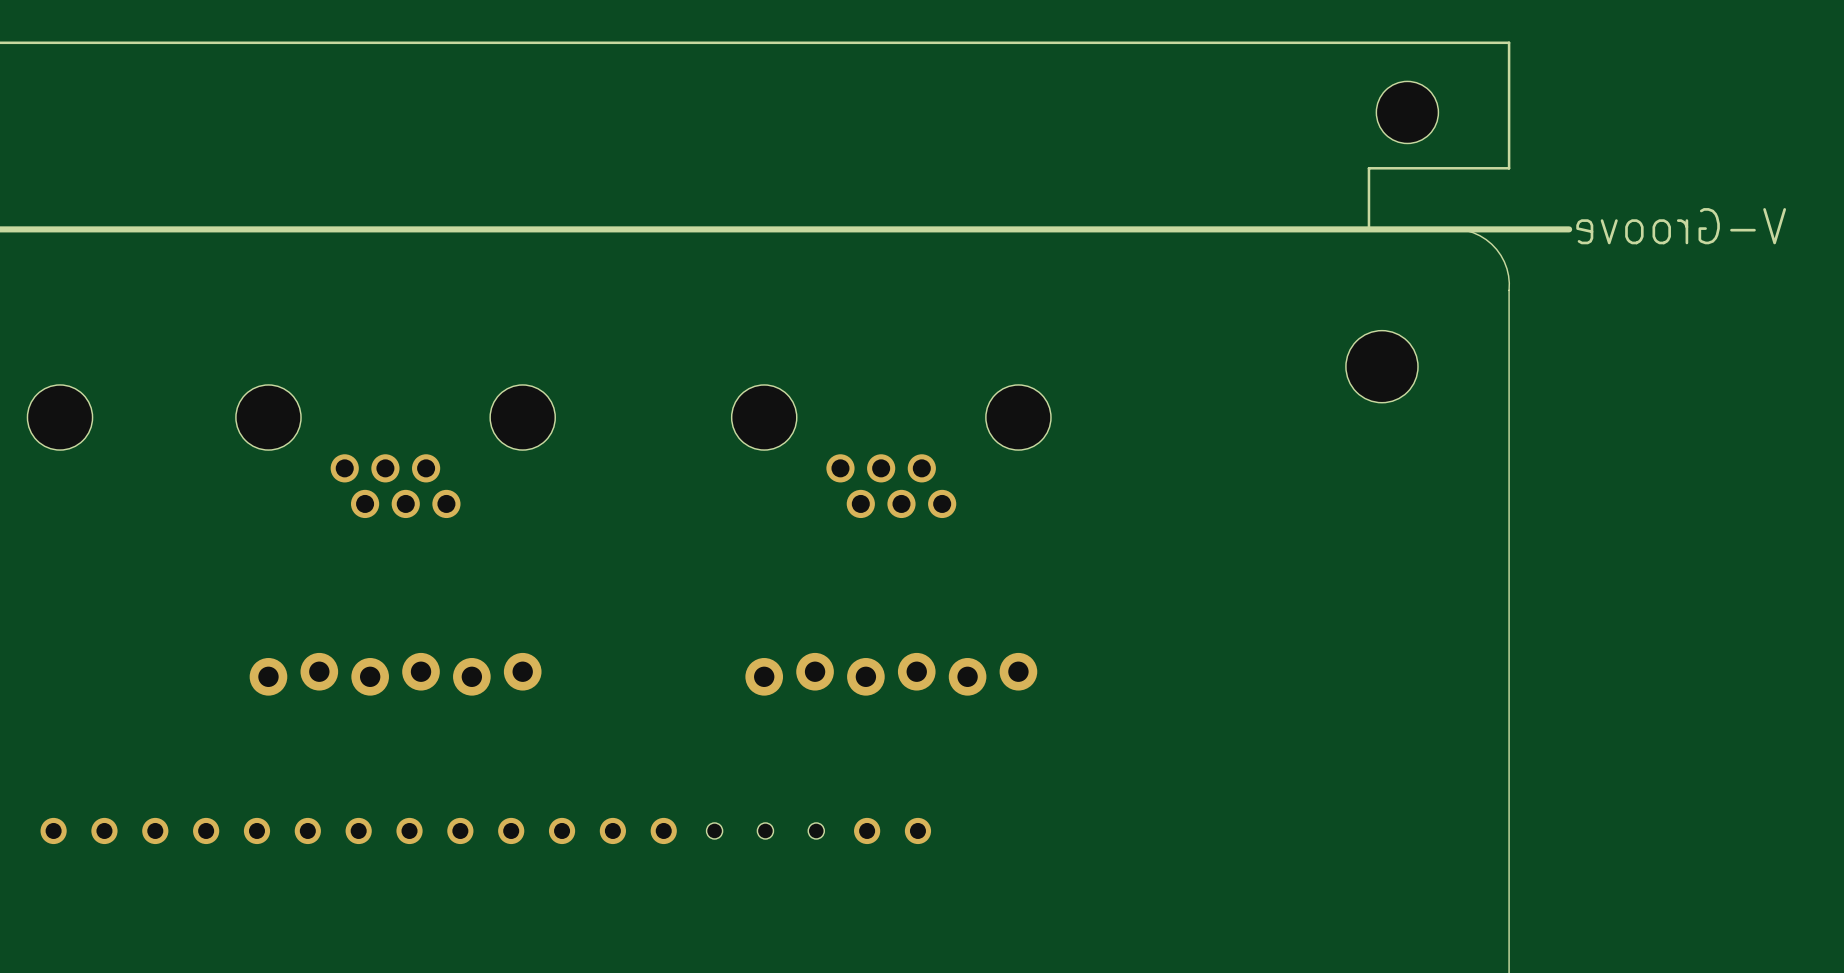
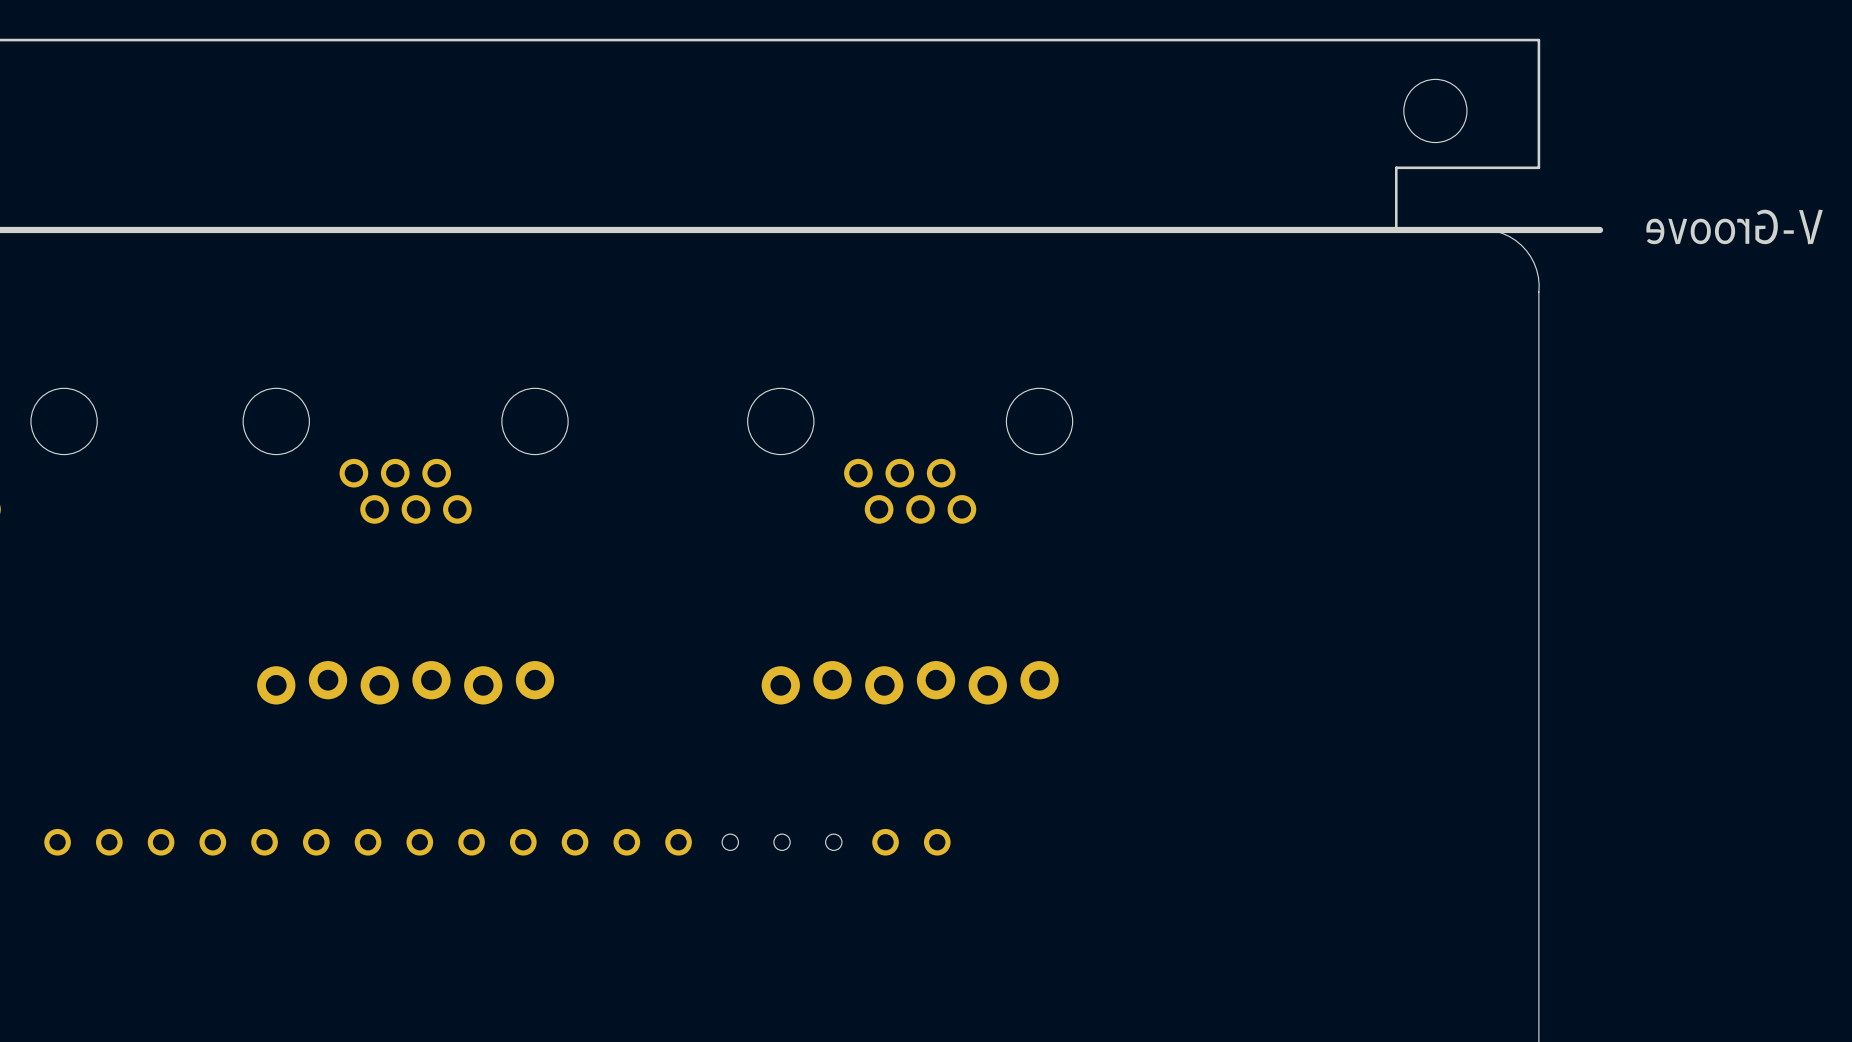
part: (1381, 366) -> none

